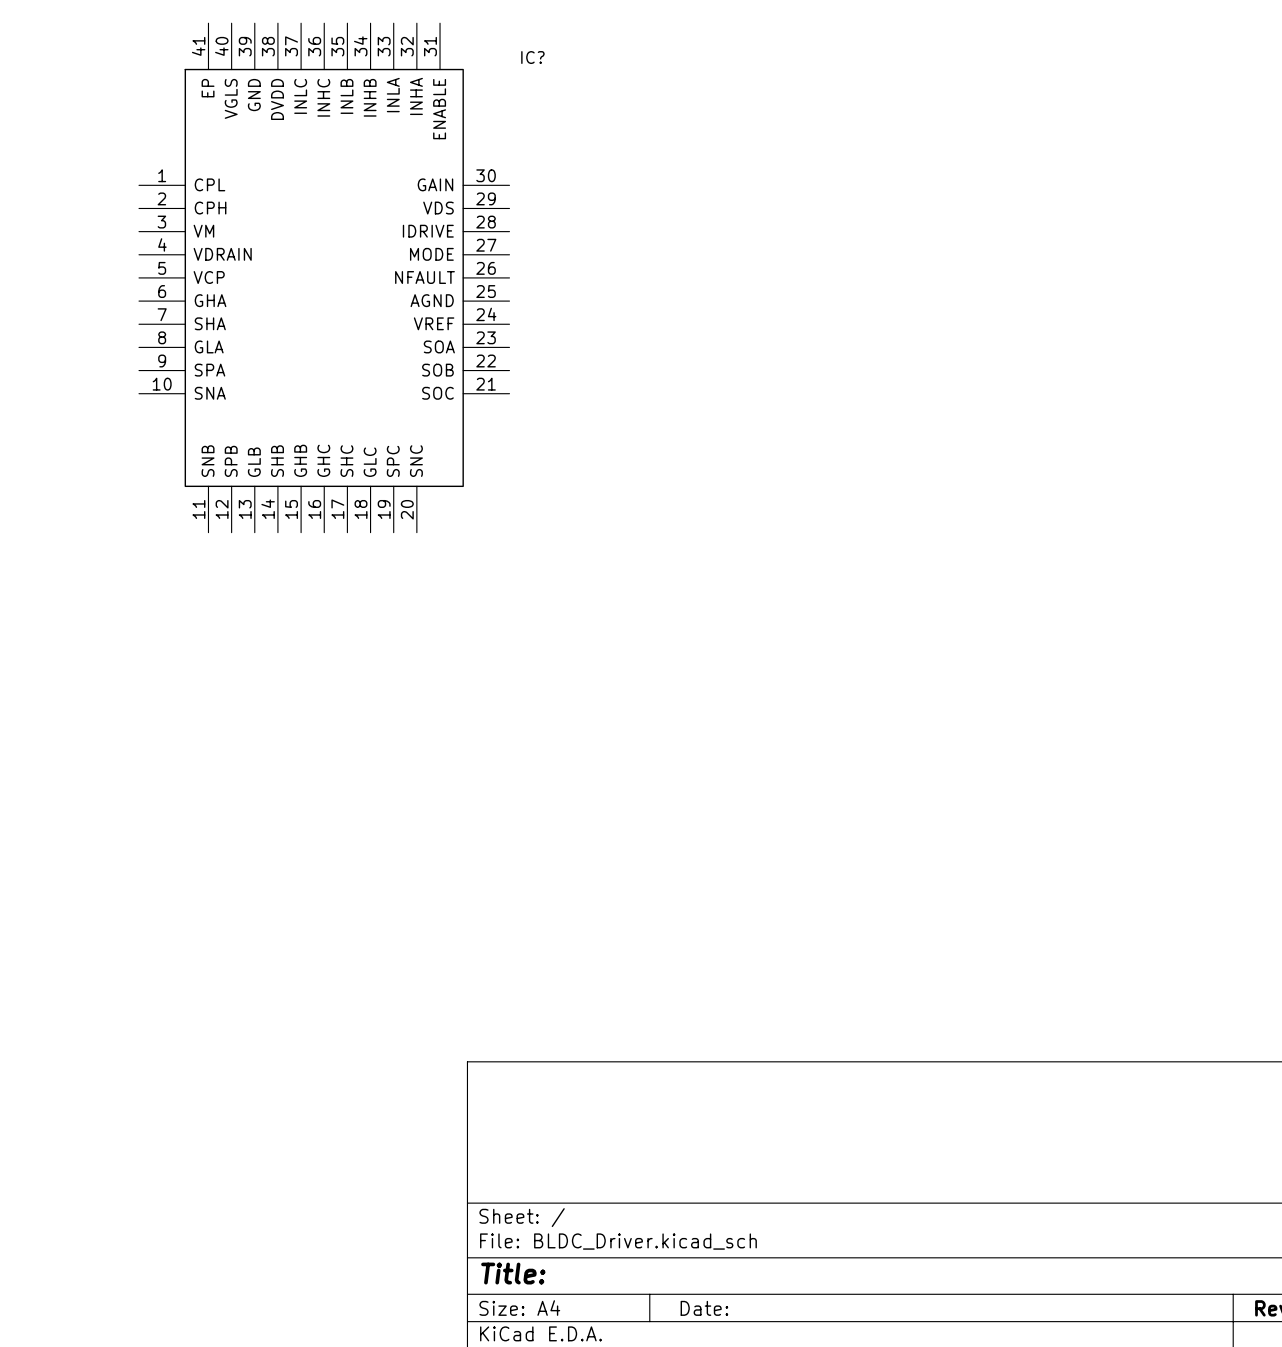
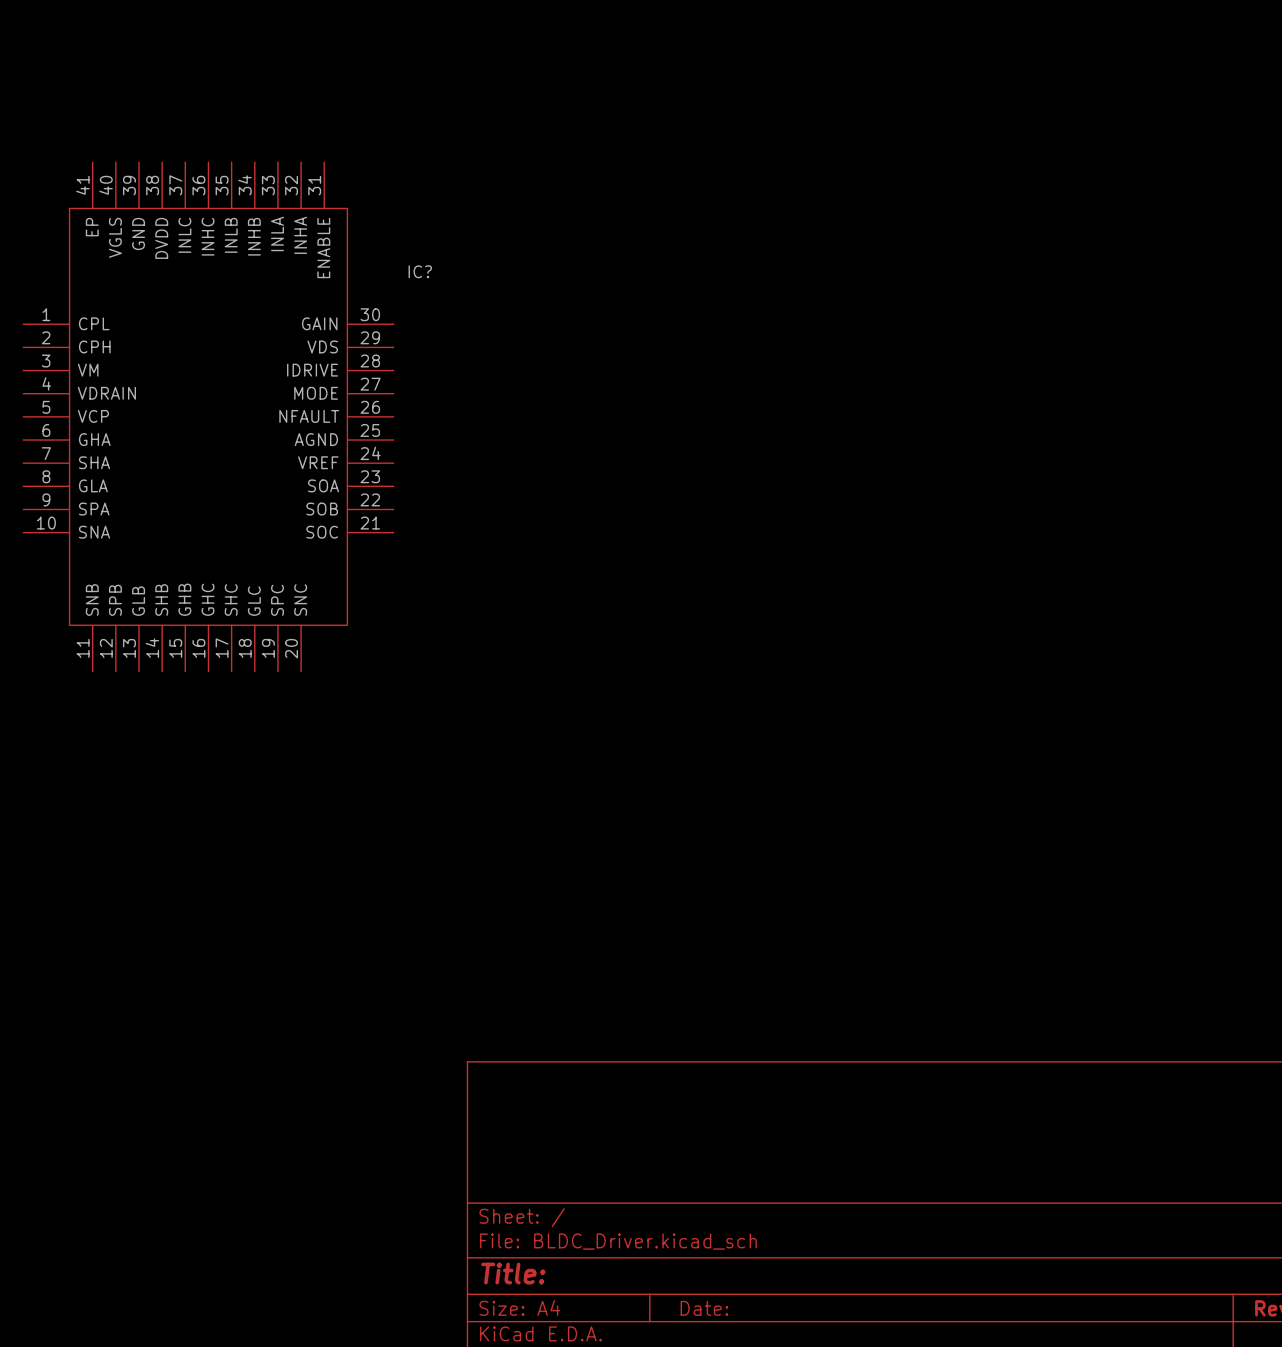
IC? name position: IC? (532, 57) -> IC? (420, 271)
IC? position: (324, 277) -> (208, 416)

